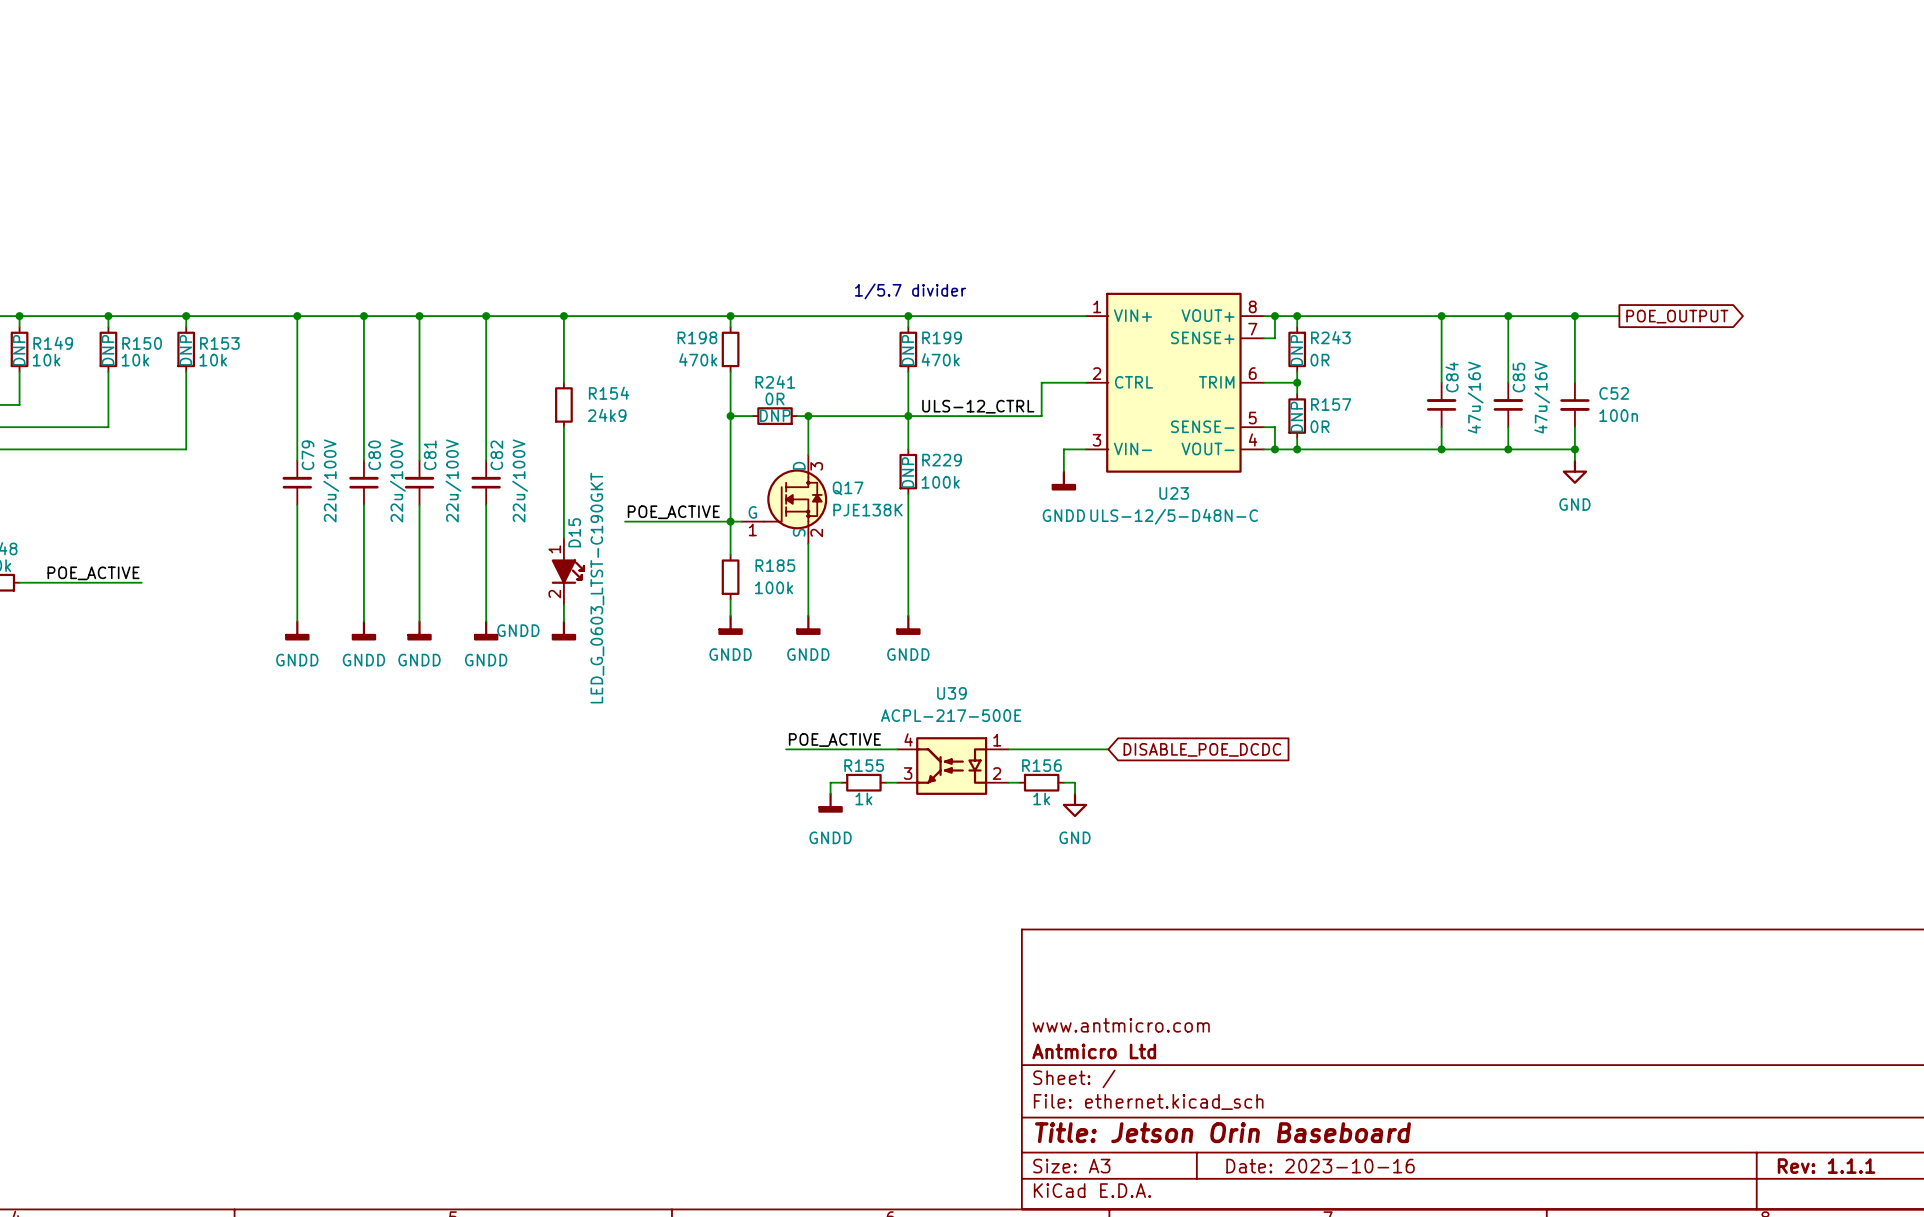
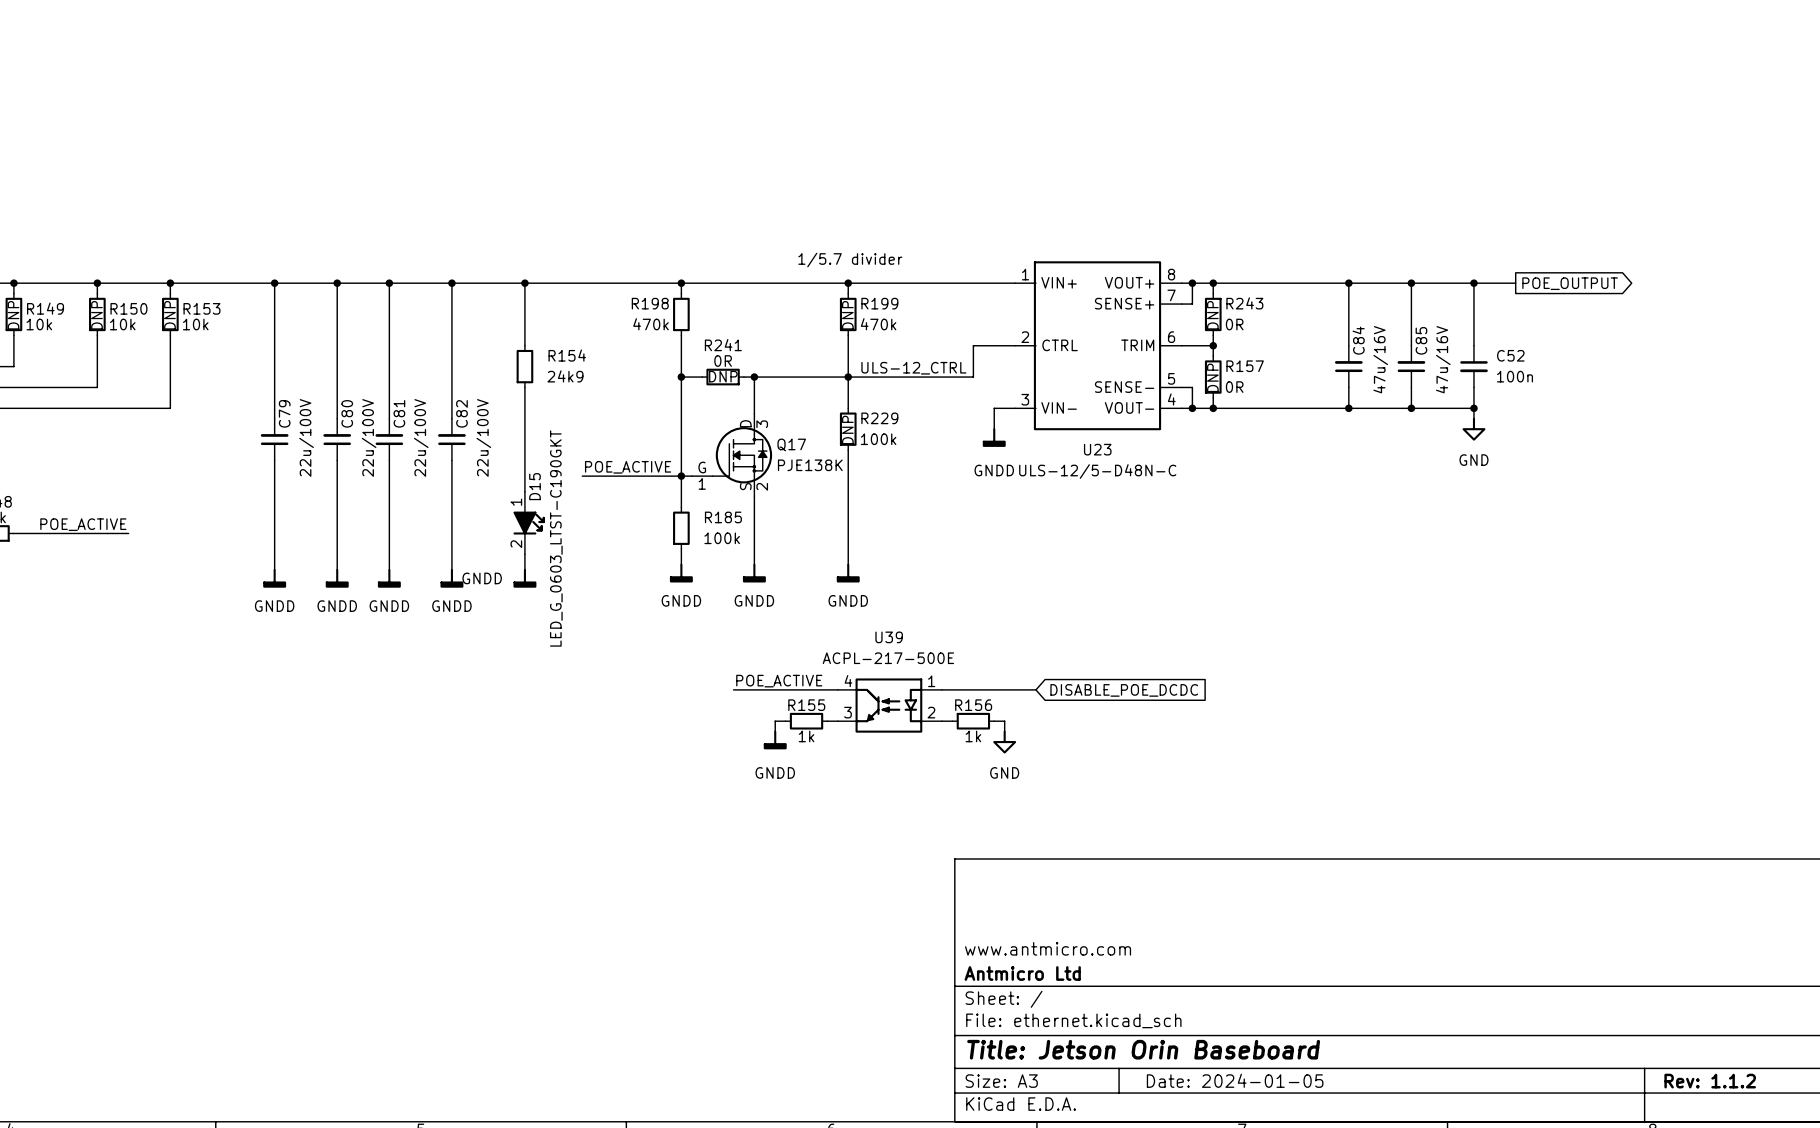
title block: Date: 2023-10-16 (1320, 1166) -> Date: 2024-01-05 (1235, 1080)
title block: Rev: 1.1.1 (1826, 1166) -> Rev: 1.1.2 (1710, 1081)

